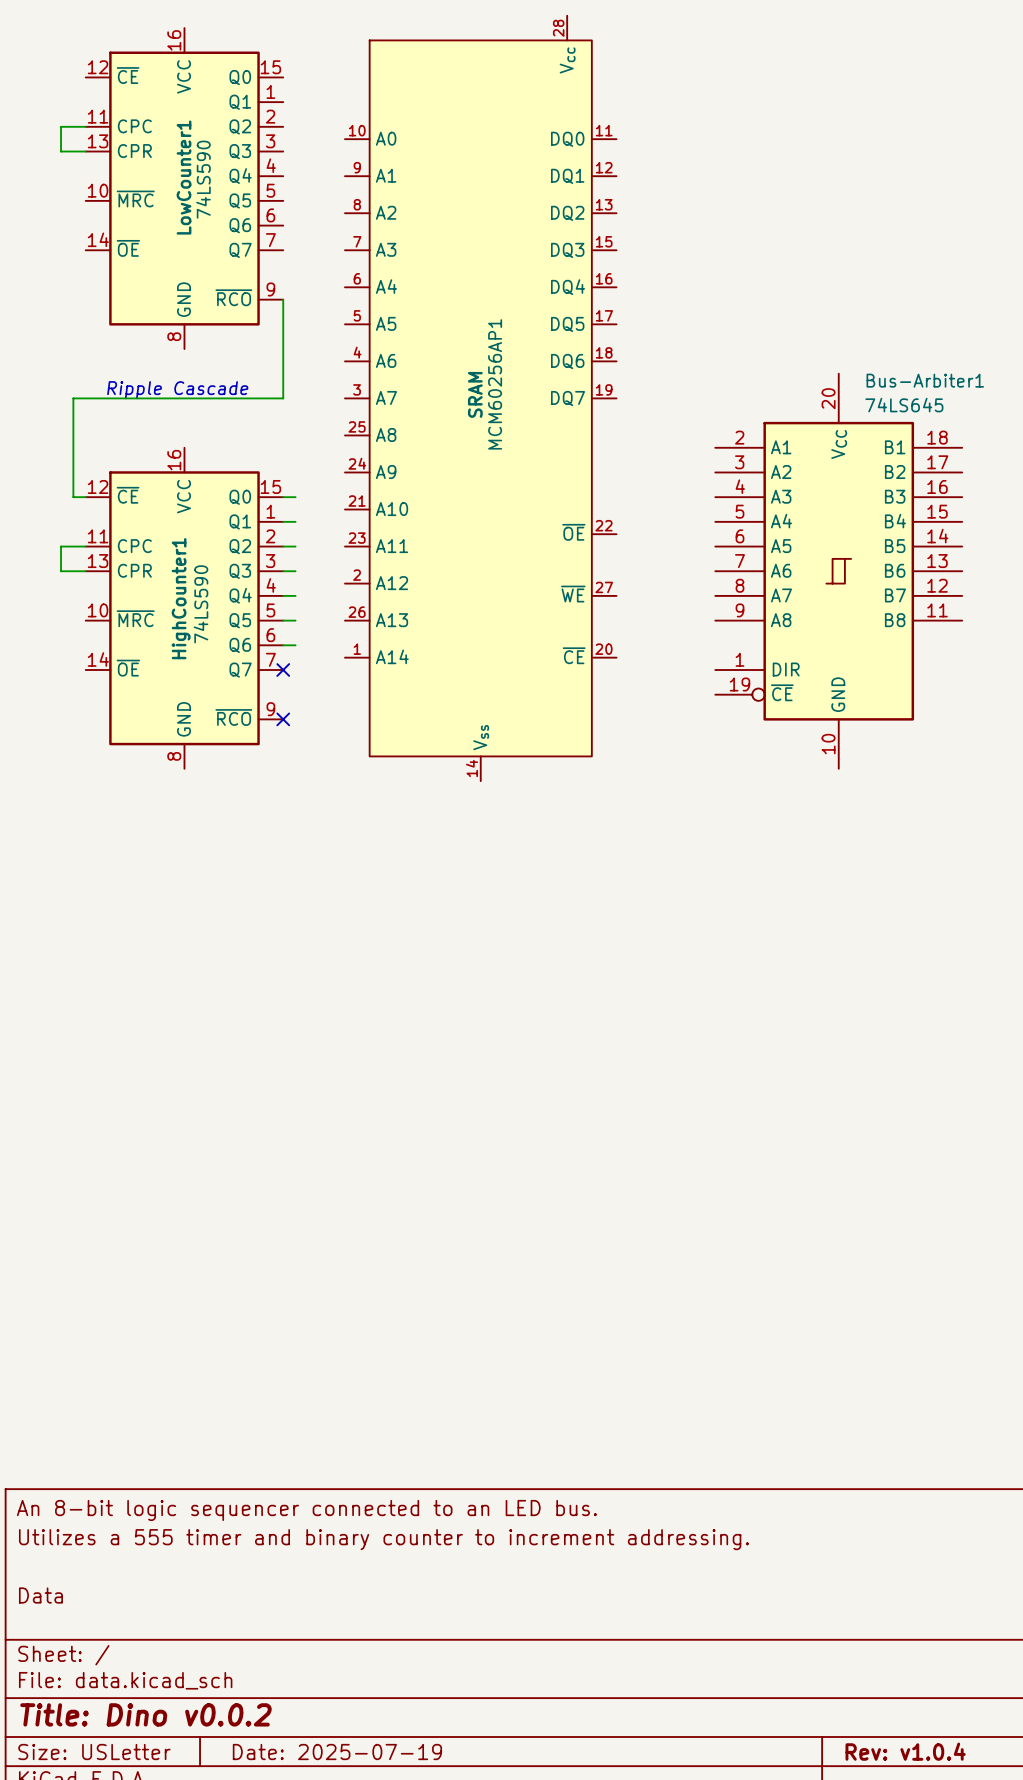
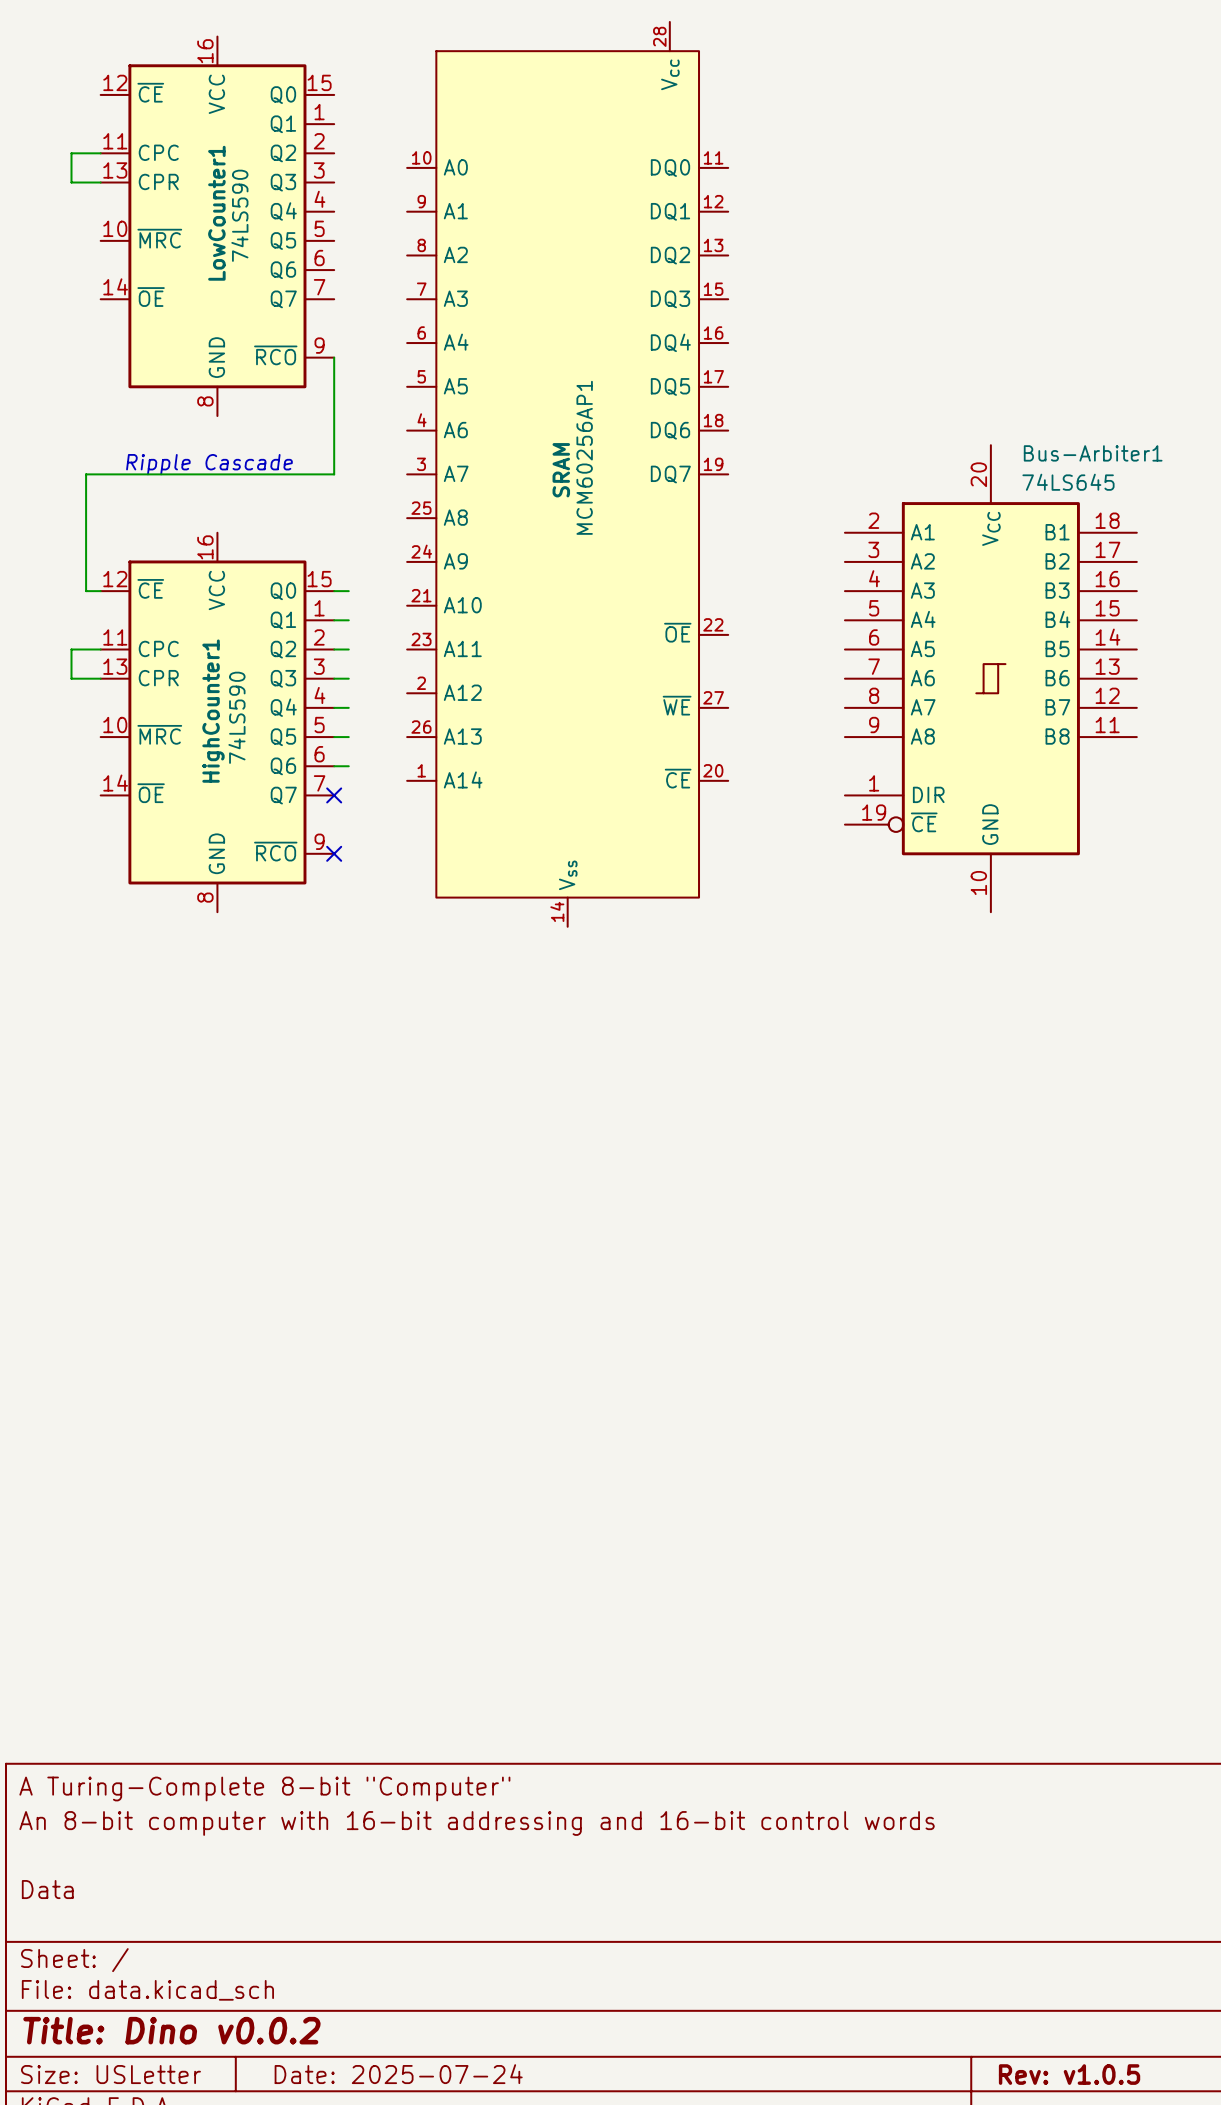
title block: An 8-bit logic sequencer connected to an LED bus. (306, 1510) -> A Turing-Complete 8-bit "Computer" (264, 1788)
title block: Utilizes a 555 timer and binary counter to increment addressing. (383, 1539) -> An 8-bit computer with 16-bit addressing and 16-bit control words (477, 1823)
title block: Rev: v1.0.4 (905, 1751) -> Rev: v1.0.5 (1069, 2074)
title block: Date: 2025-07-19 (337, 1752) -> Date: 2025-07-24 (398, 2074)

